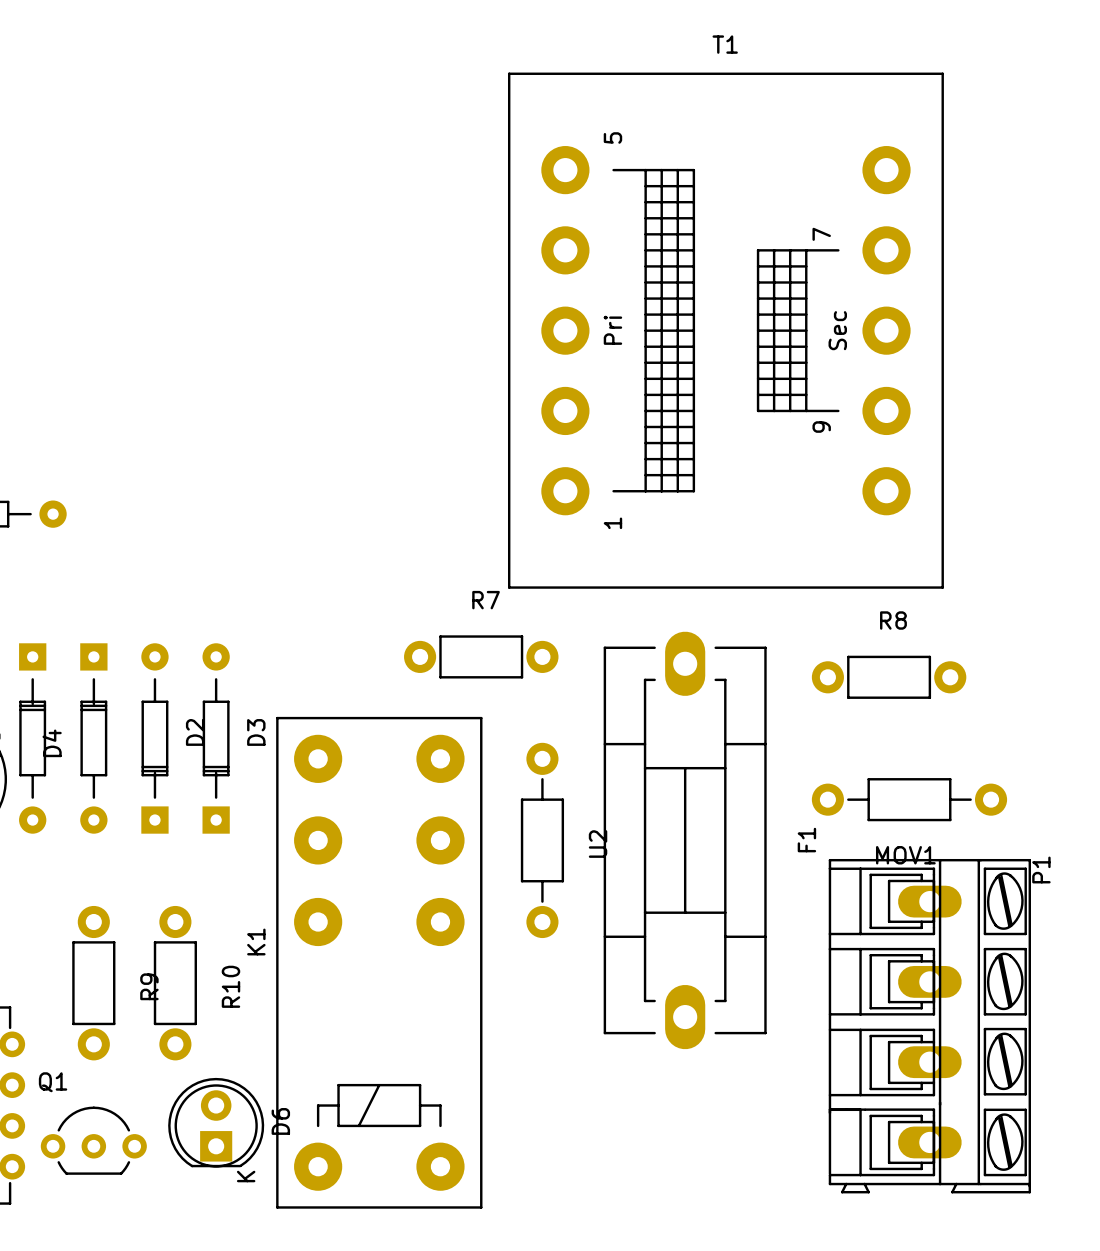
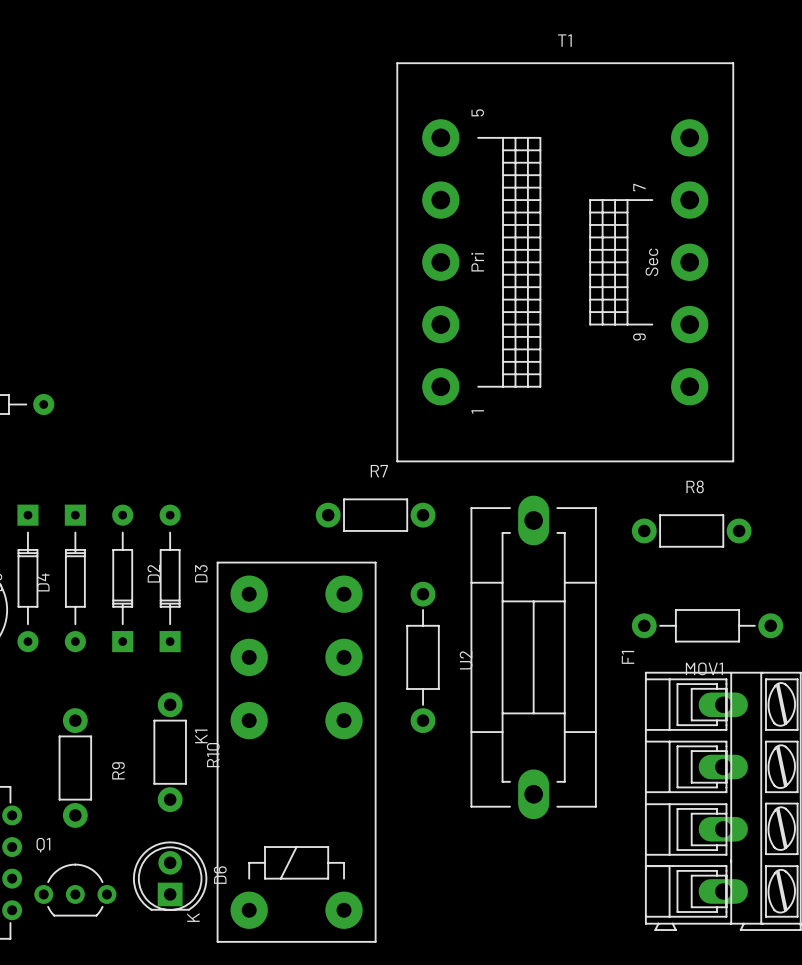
R10 position: (175, 983) -> (170, 752)

